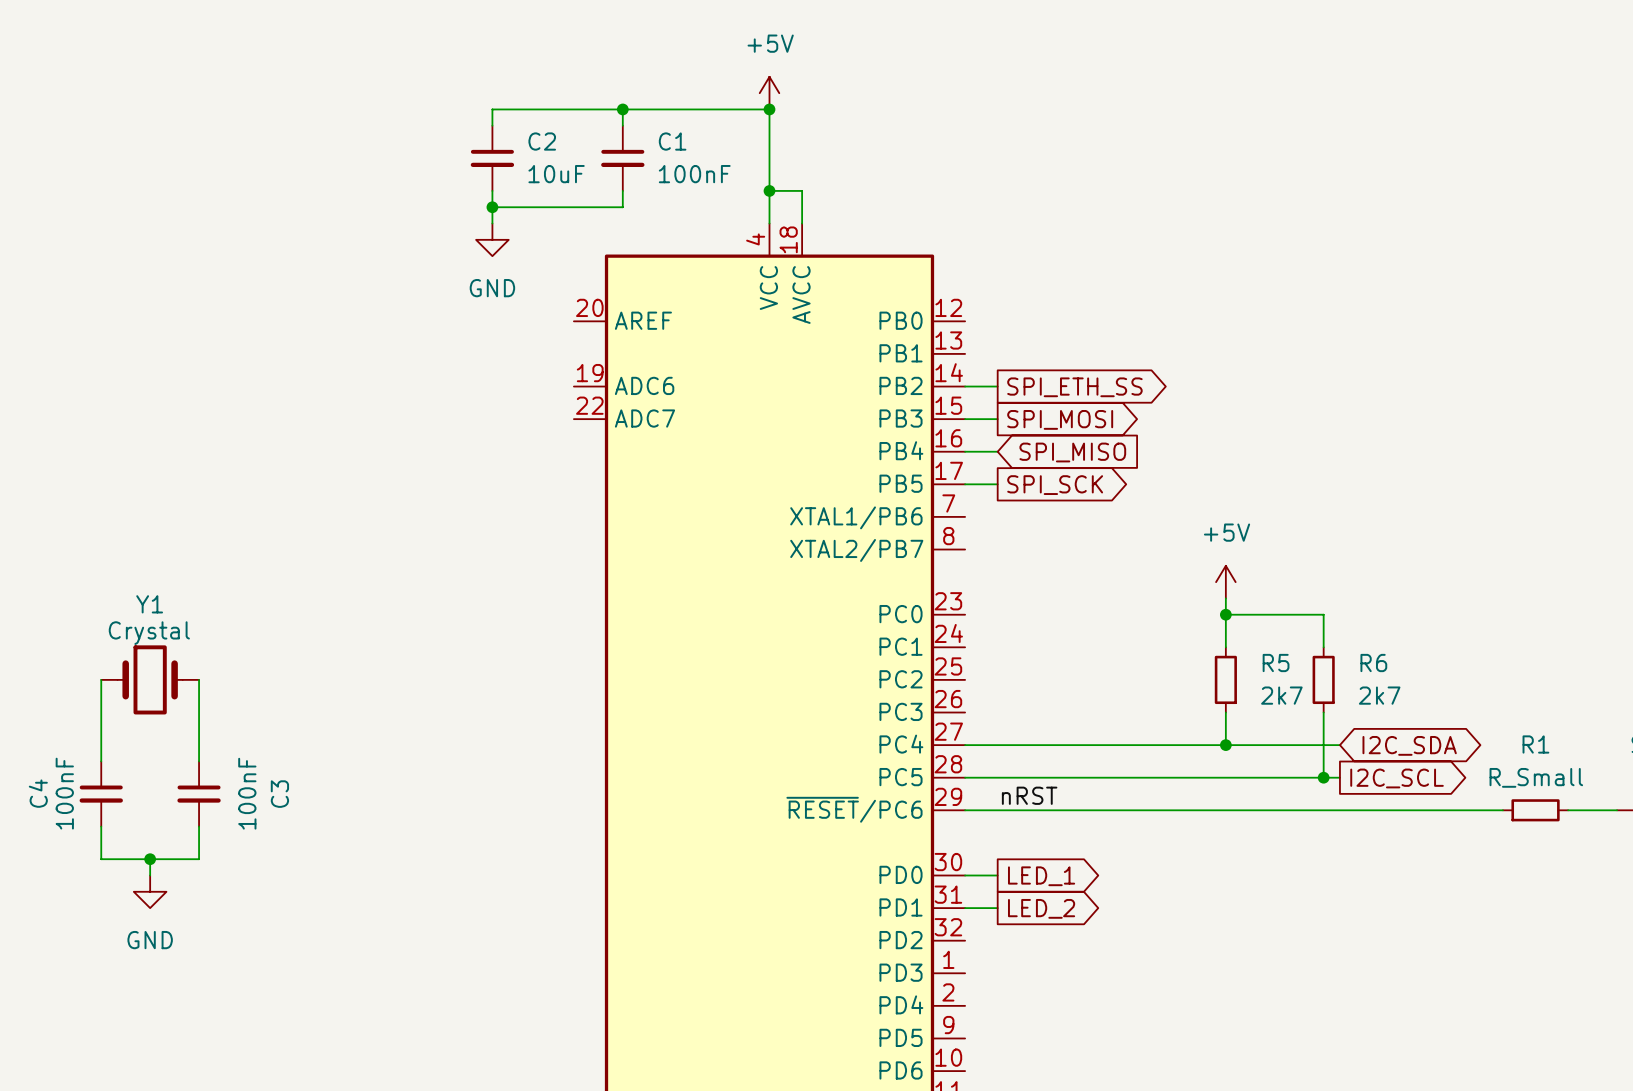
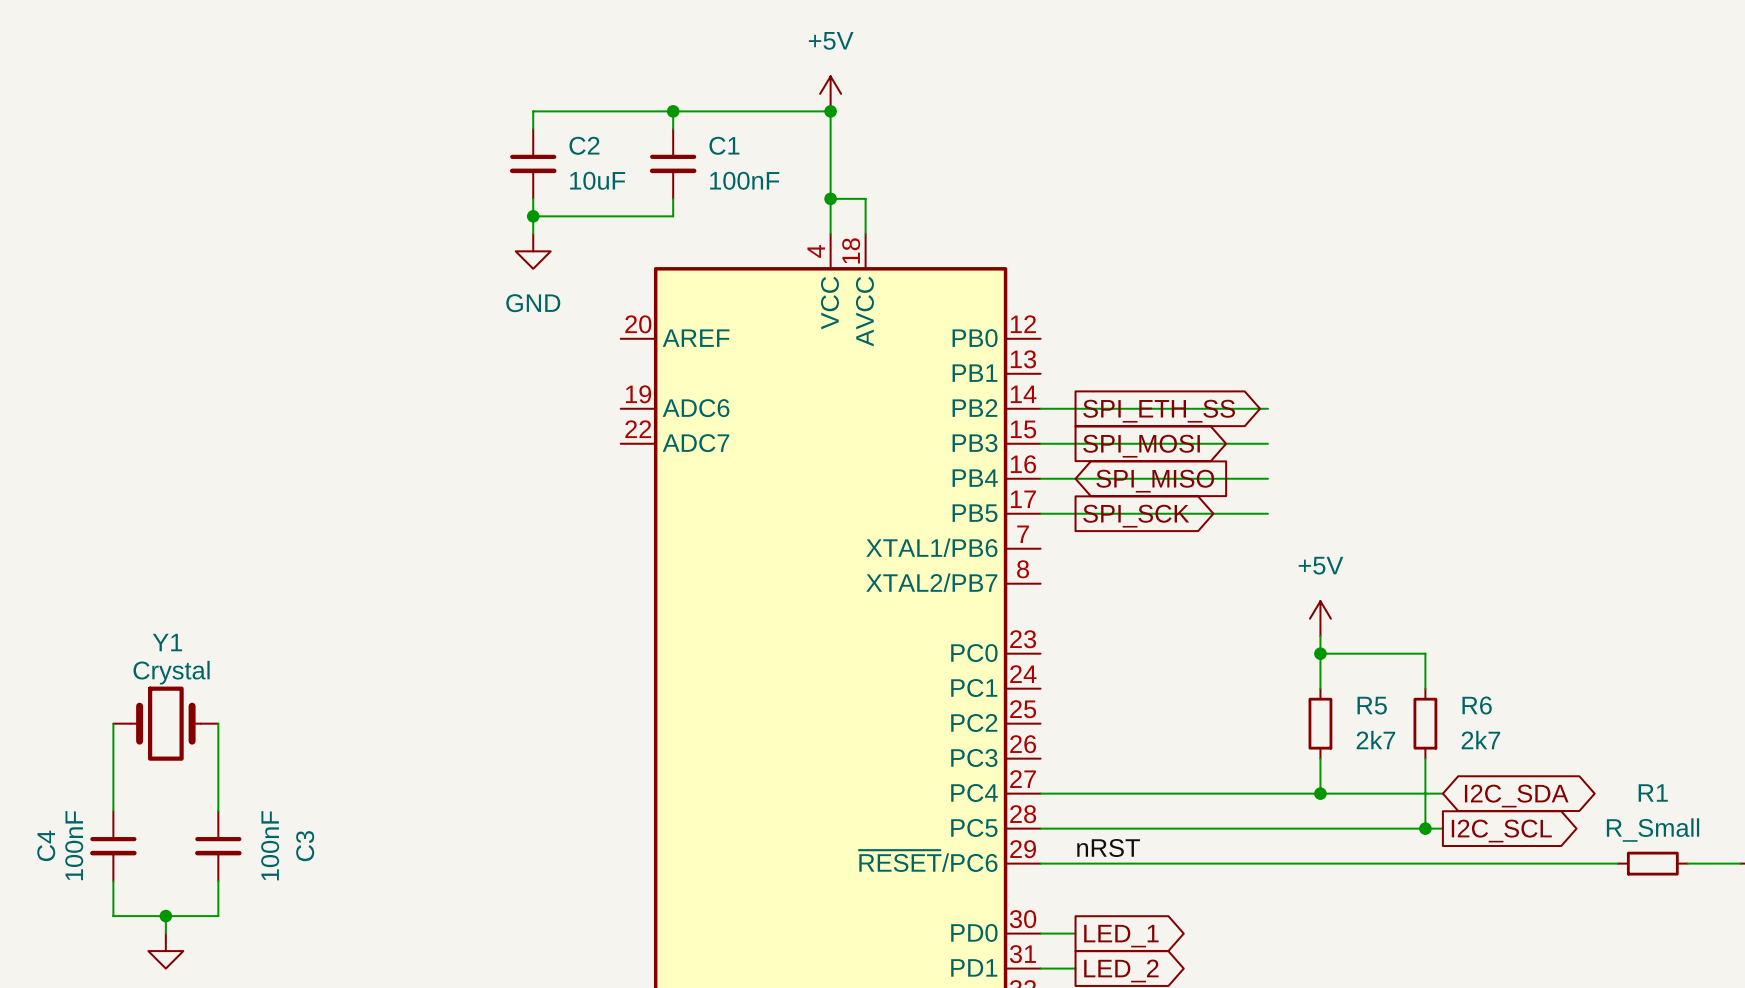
wire: none -> (1075, 408) (1267, 408)
wire: none -> (1075, 443) (1267, 443)
wire: none -> (1075, 478) (1267, 478)
wire: none -> (1075, 513) (1267, 513)

